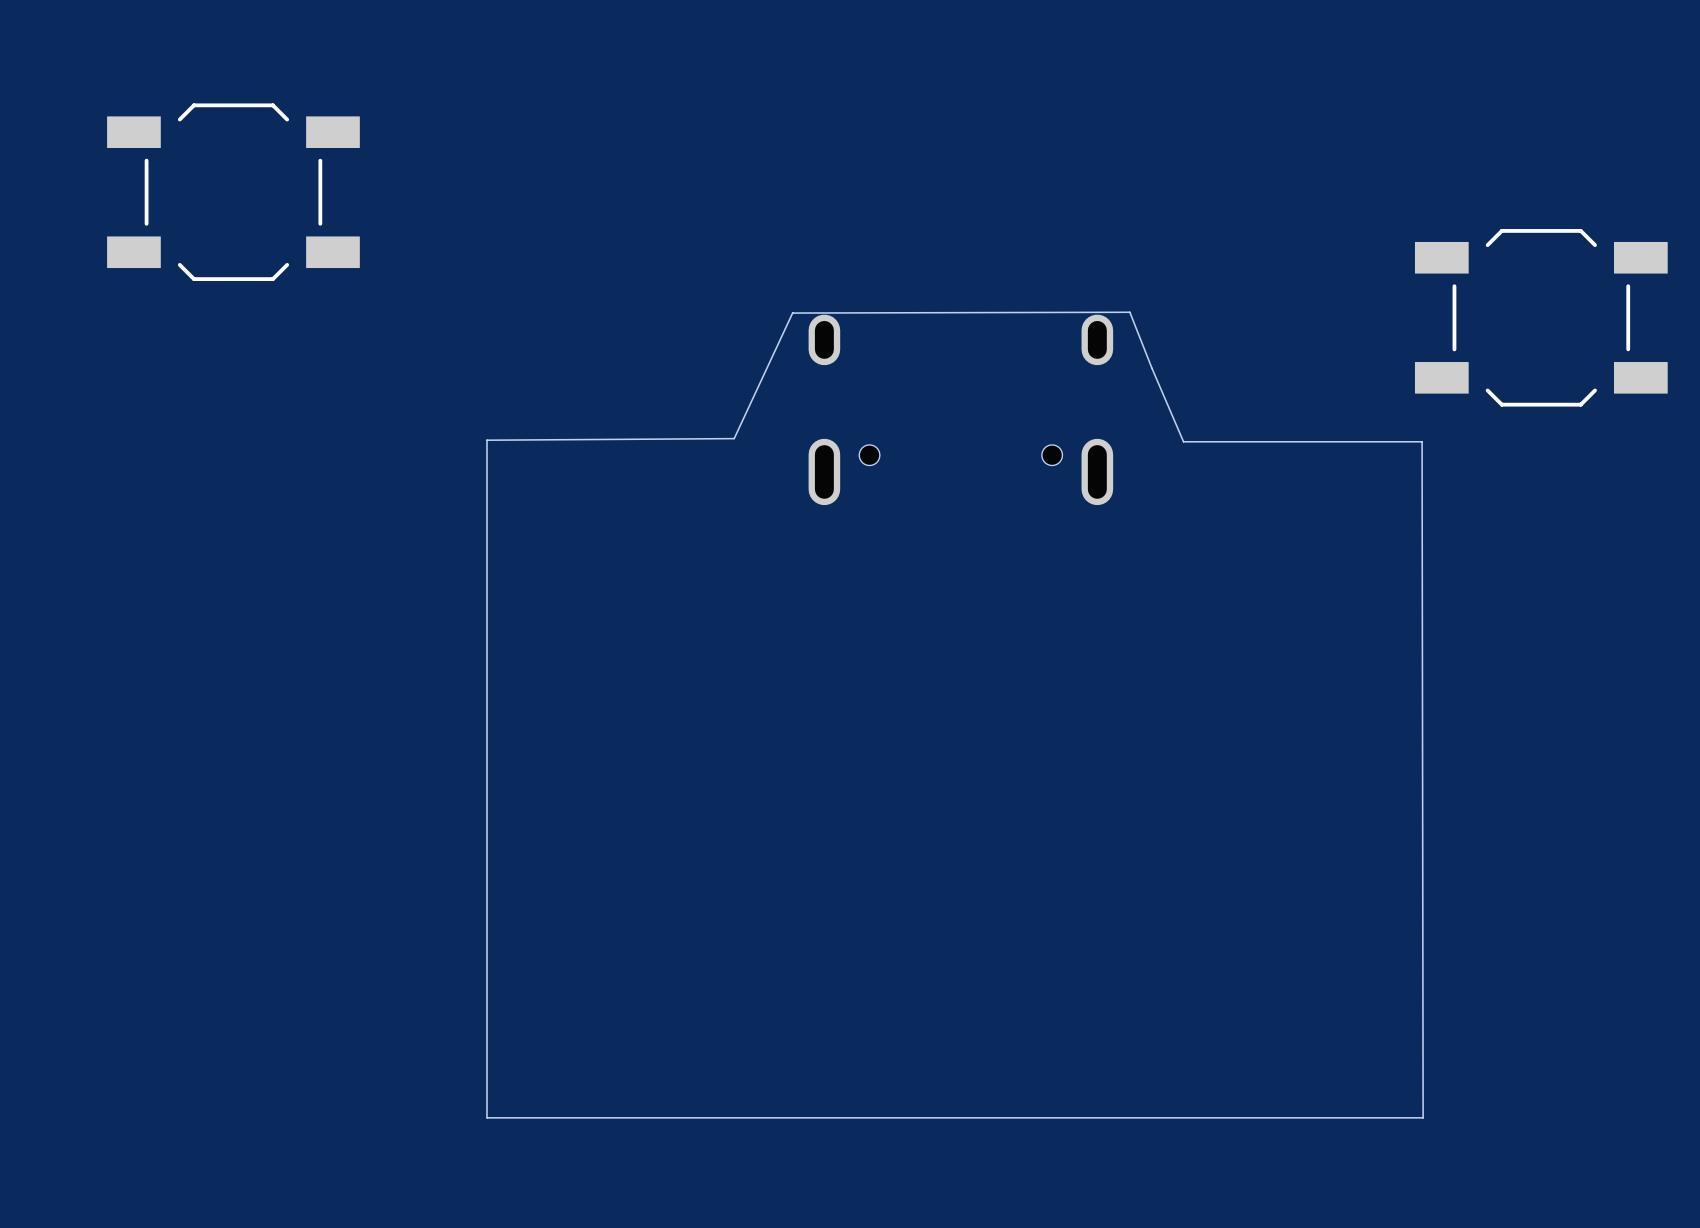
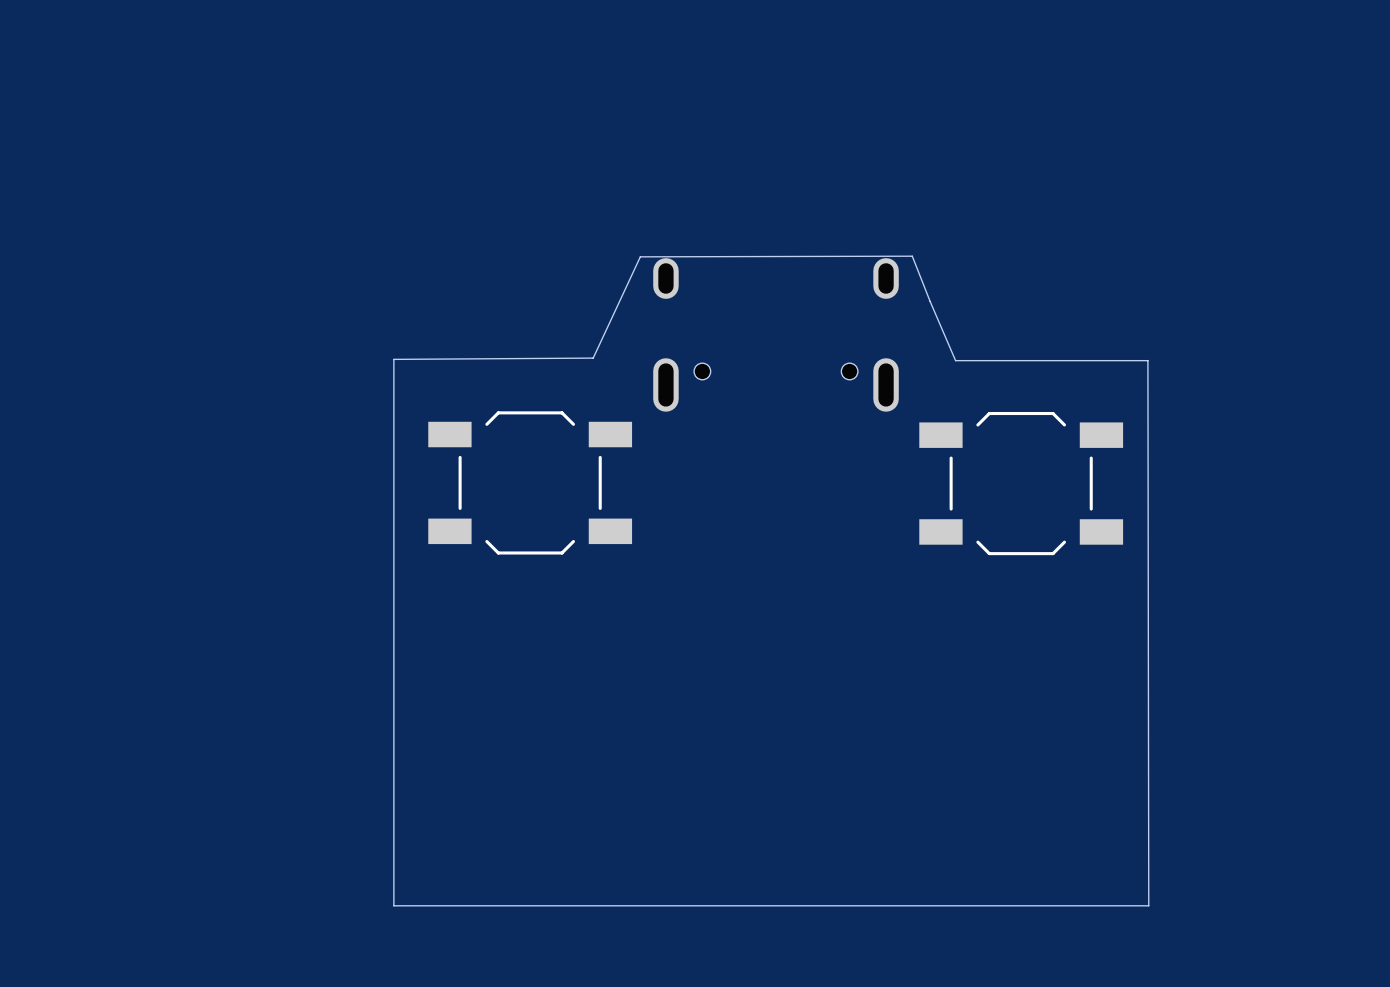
part: (233, 192) -> none
part position: (1541, 317) -> (1021, 483)
part: none -> (530, 482)

